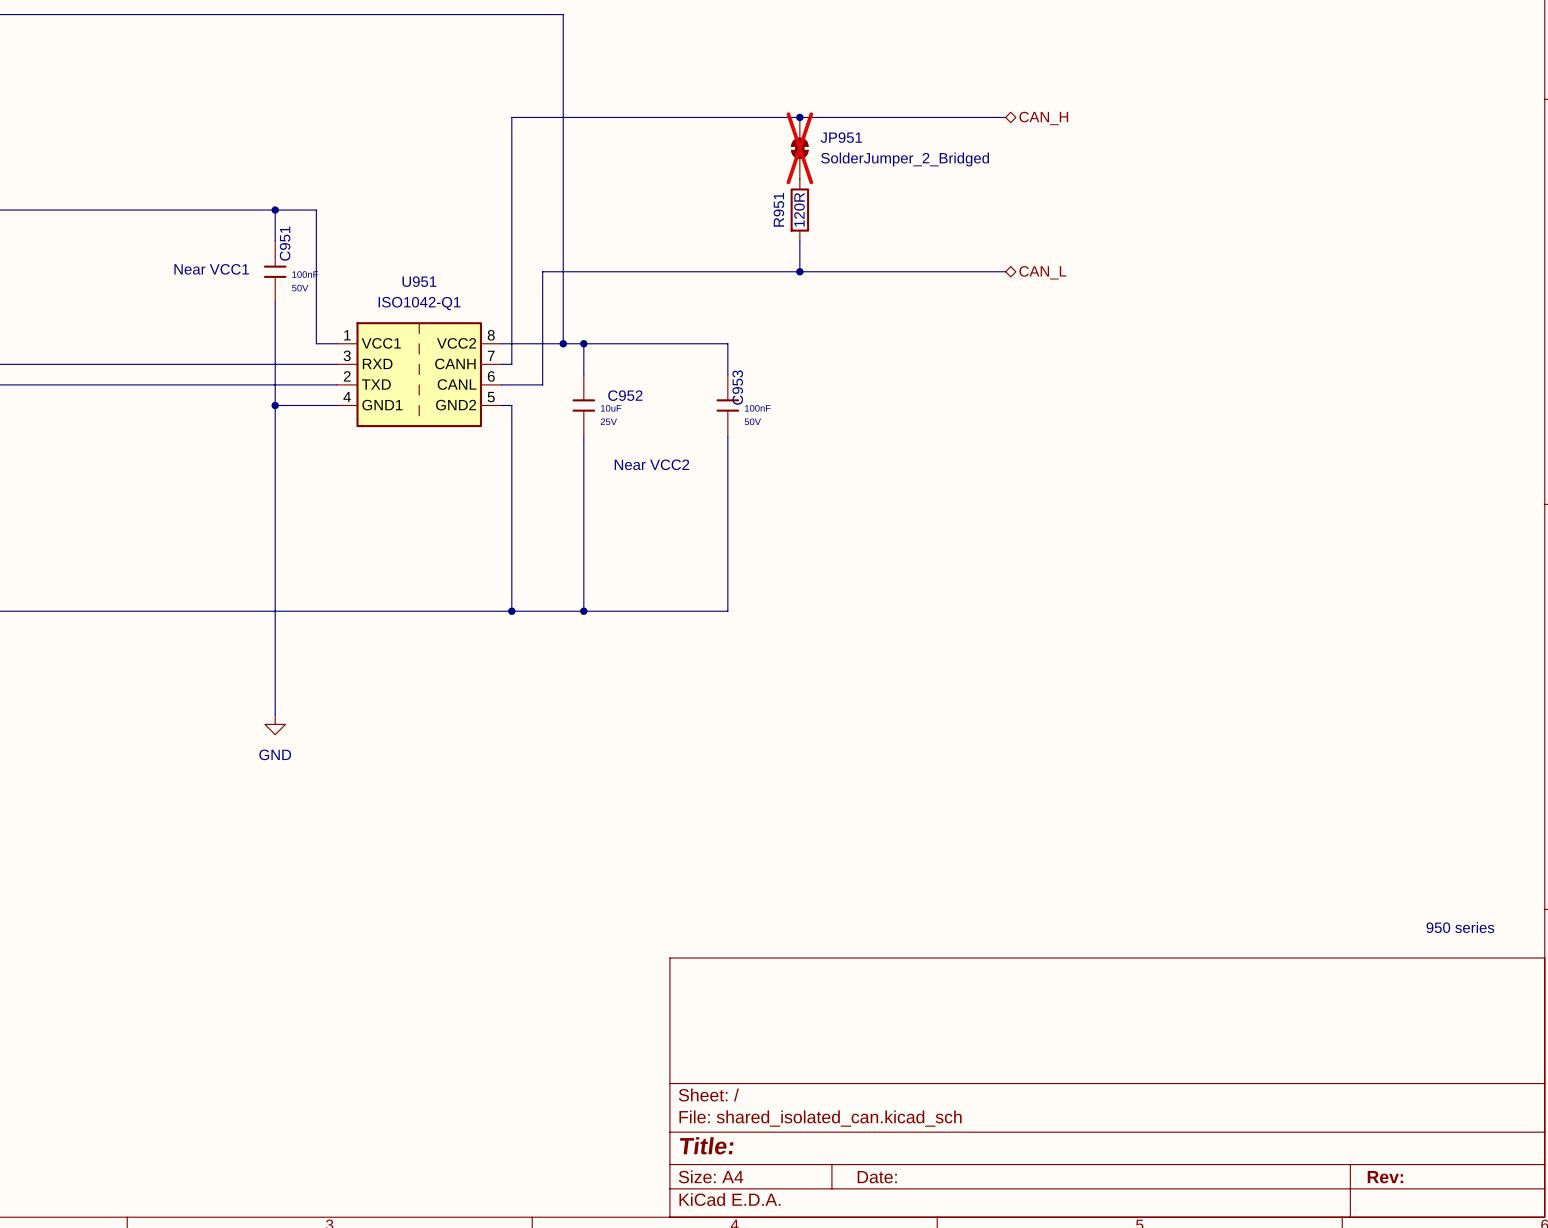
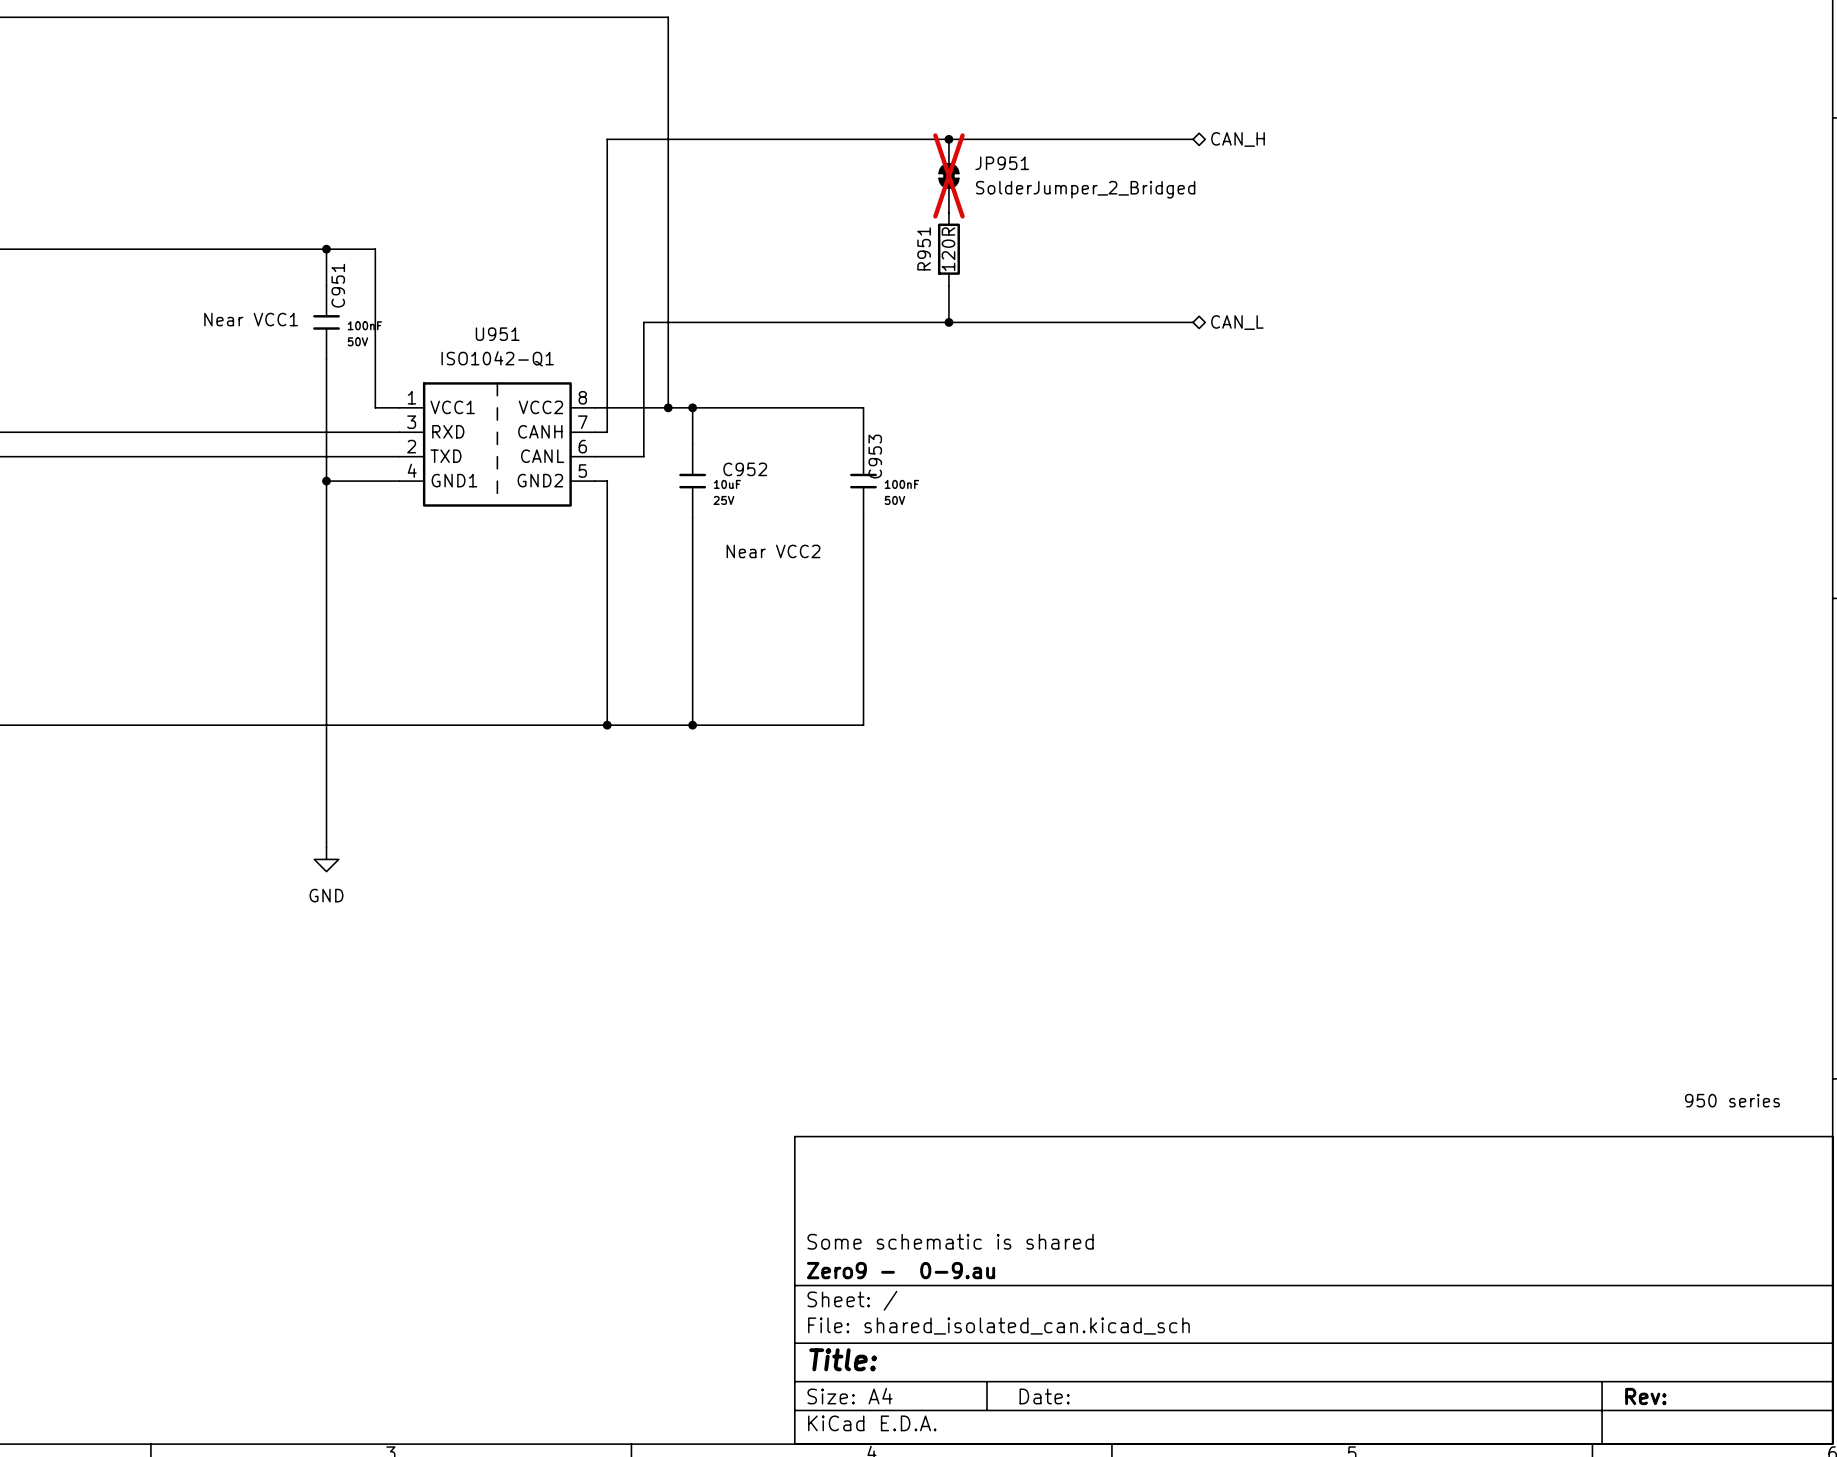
title block: none -> Some schematic is shared (950, 1241)
title block: none -> Zero9 - 0-9.au (901, 1270)

